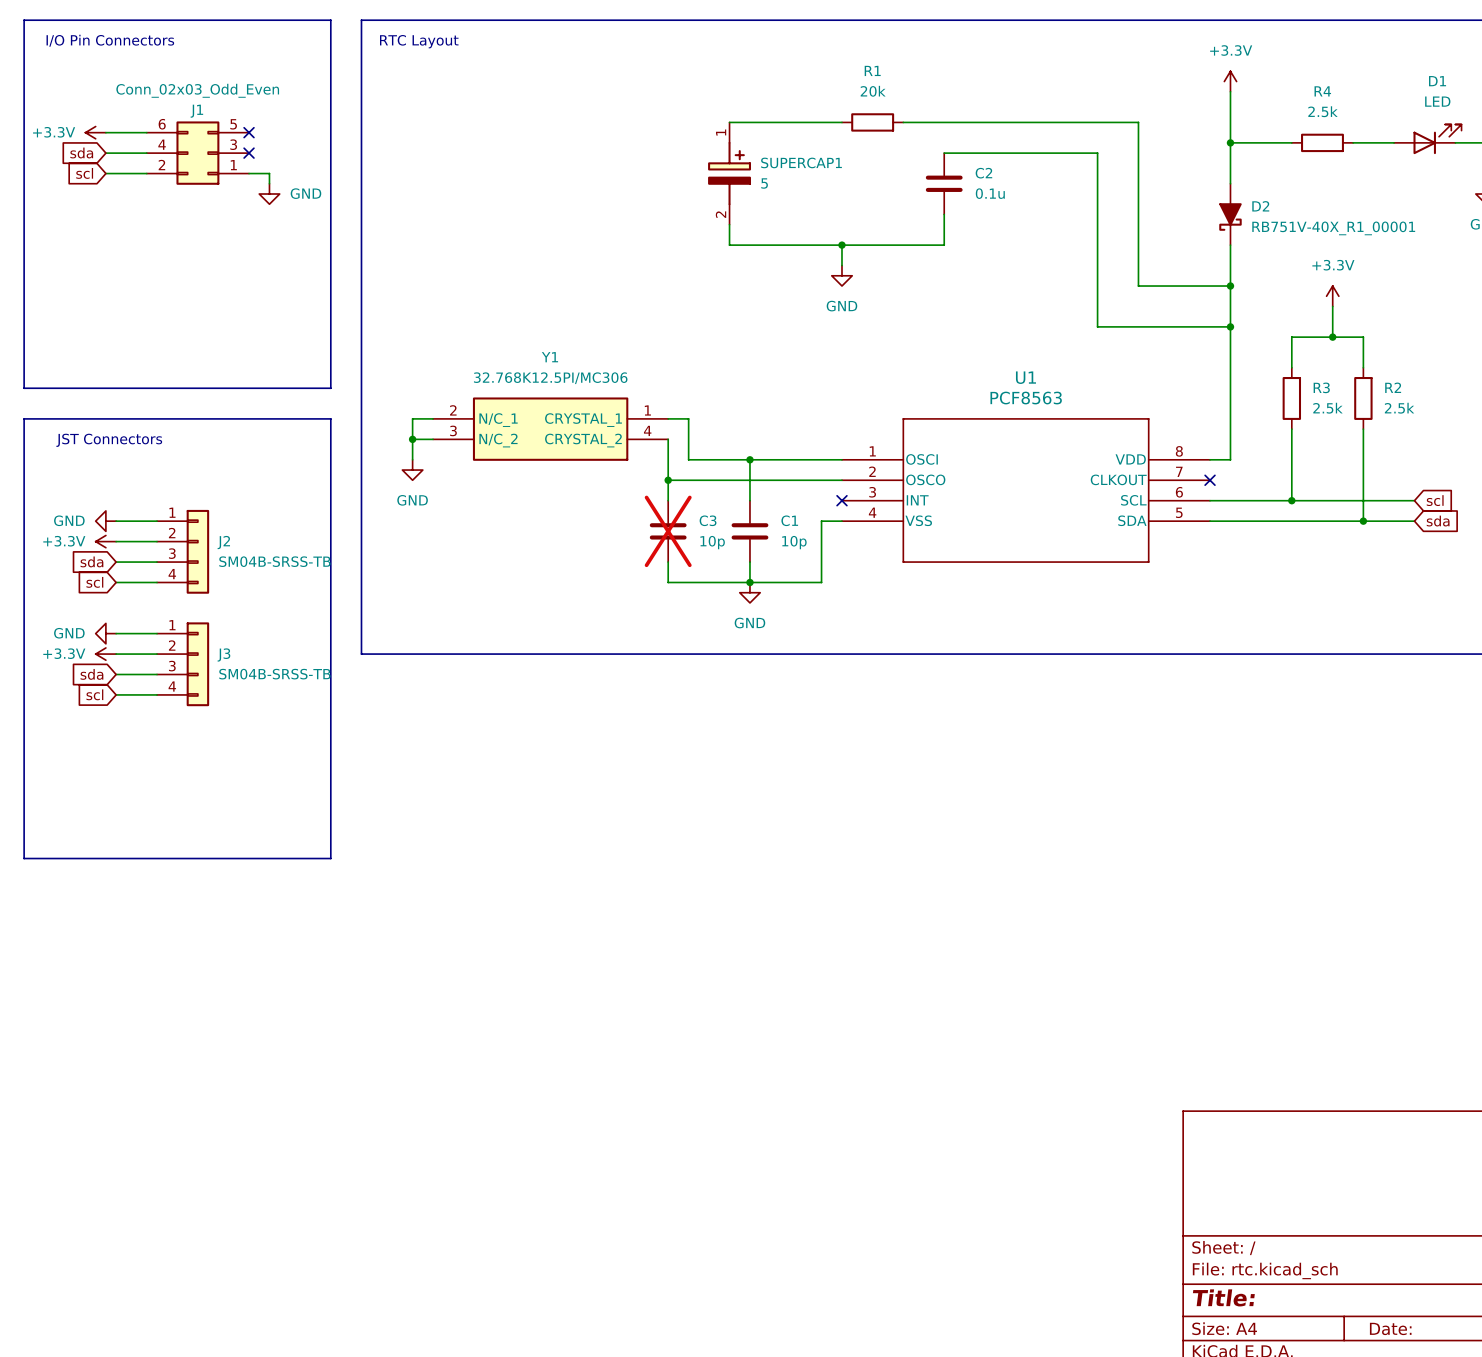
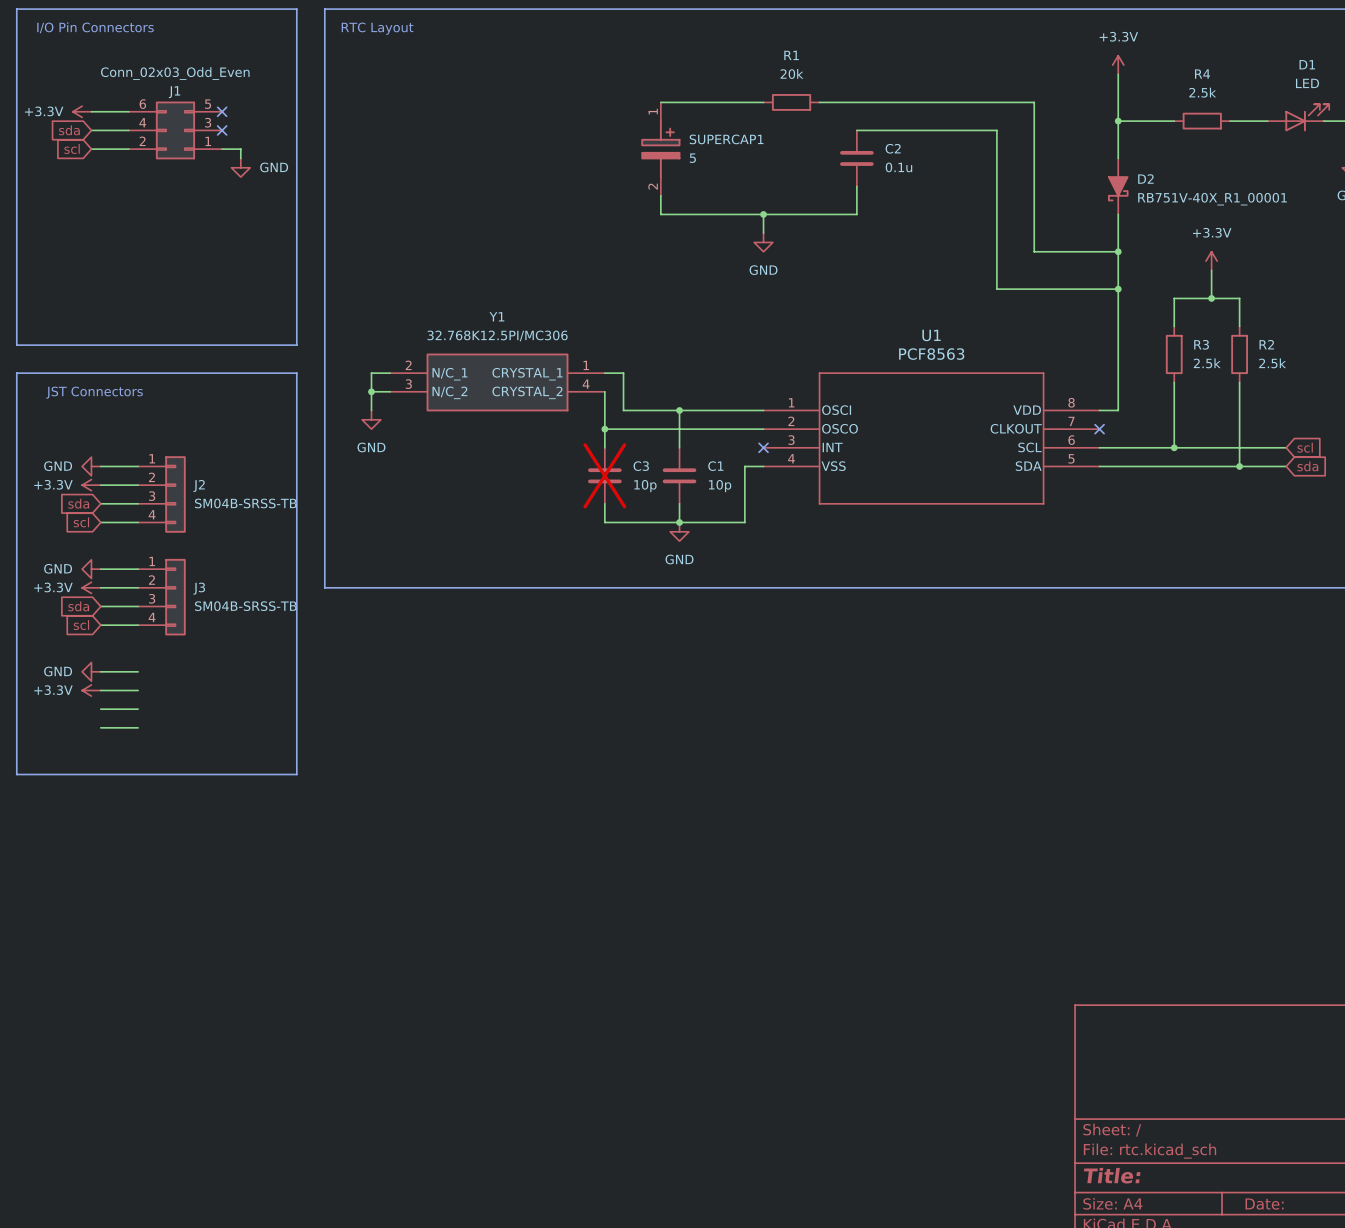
power symbol: none -> GND (91, 671)
wire: none -> (100, 671) (138, 671)
power symbol: none -> +3.3V (91, 690)
wire: none -> (100, 690) (138, 690)
wire: none -> (100, 709) (138, 709)
wire: none -> (100, 727) (138, 727)

